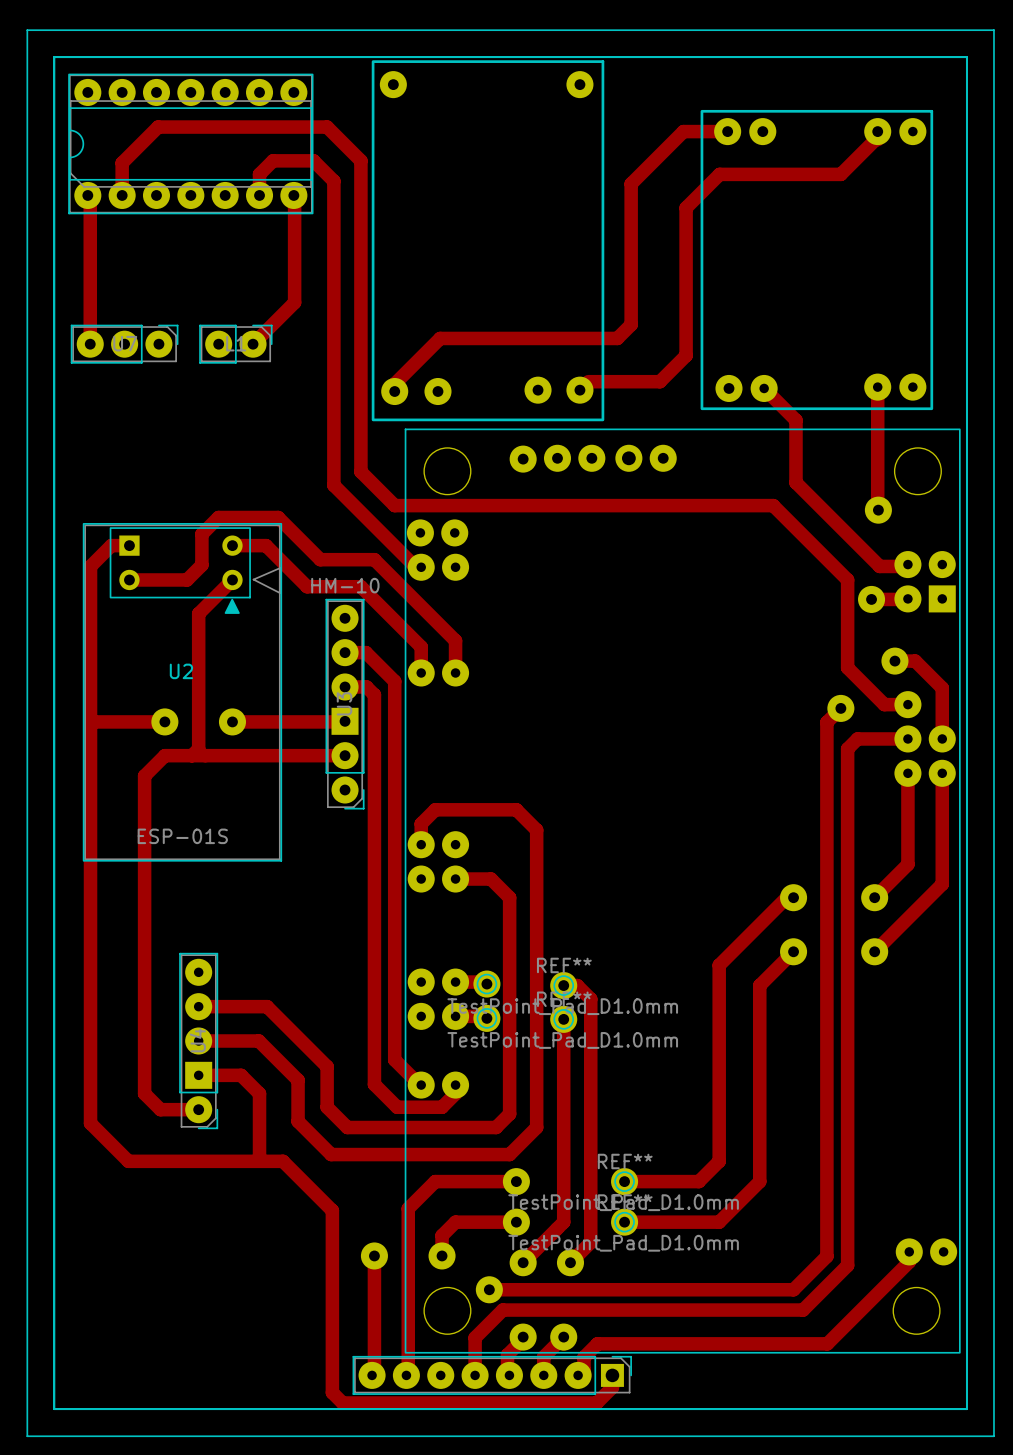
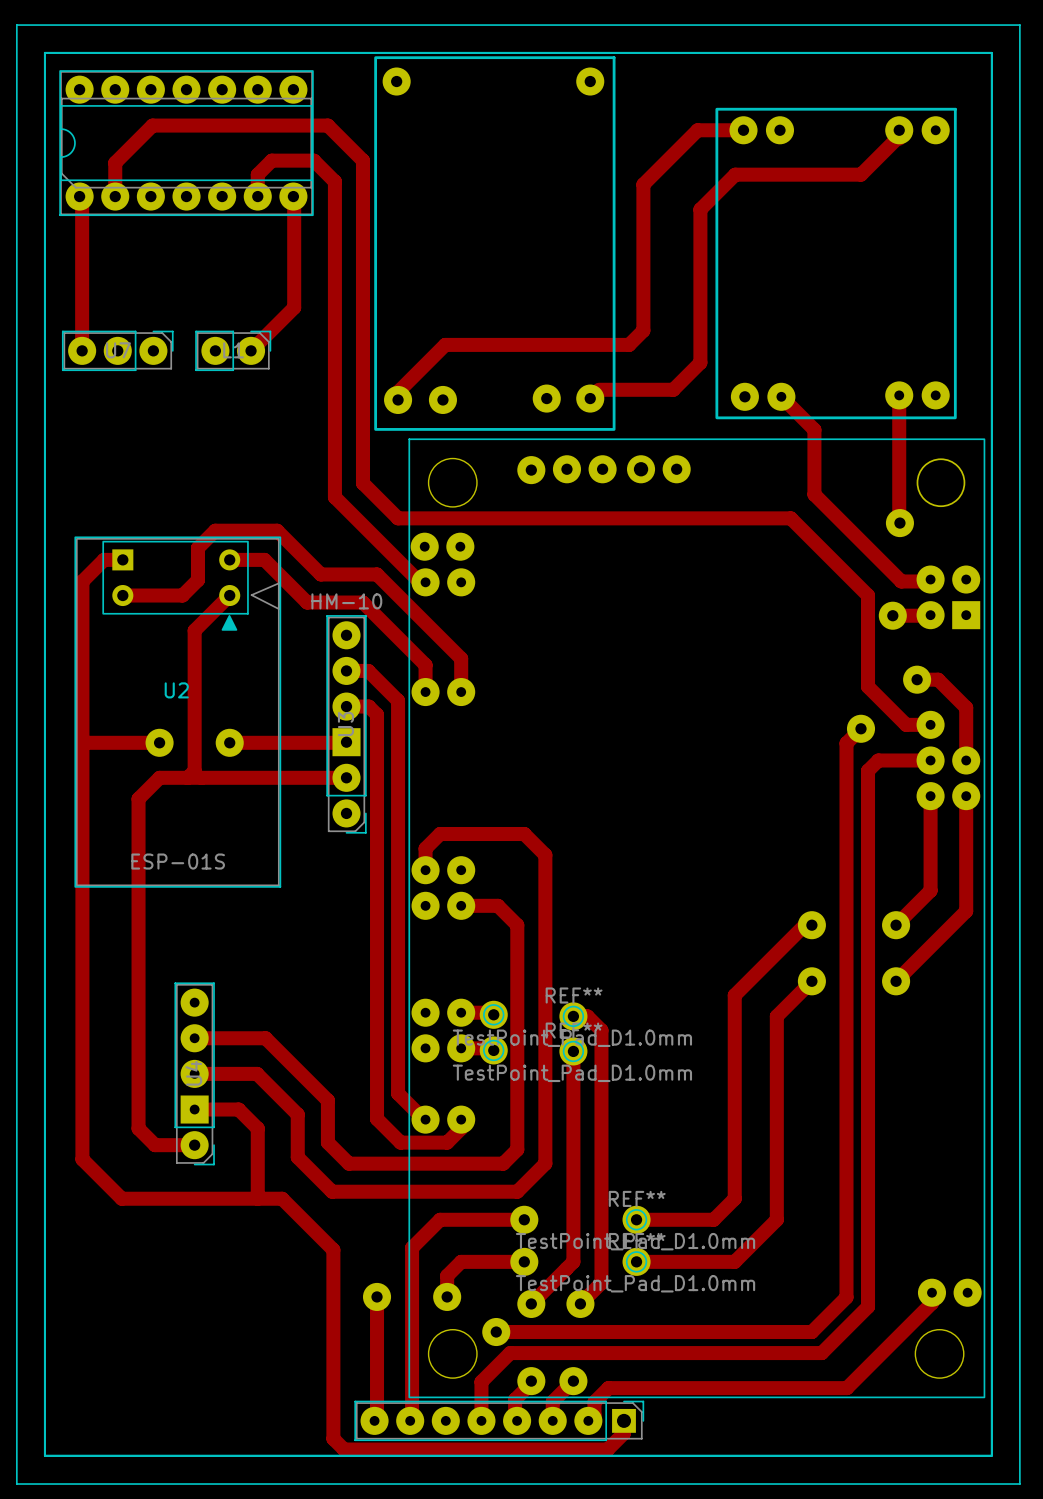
part footprint: [404, 428, 961, 1354] -> [408, 438, 986, 1399]

